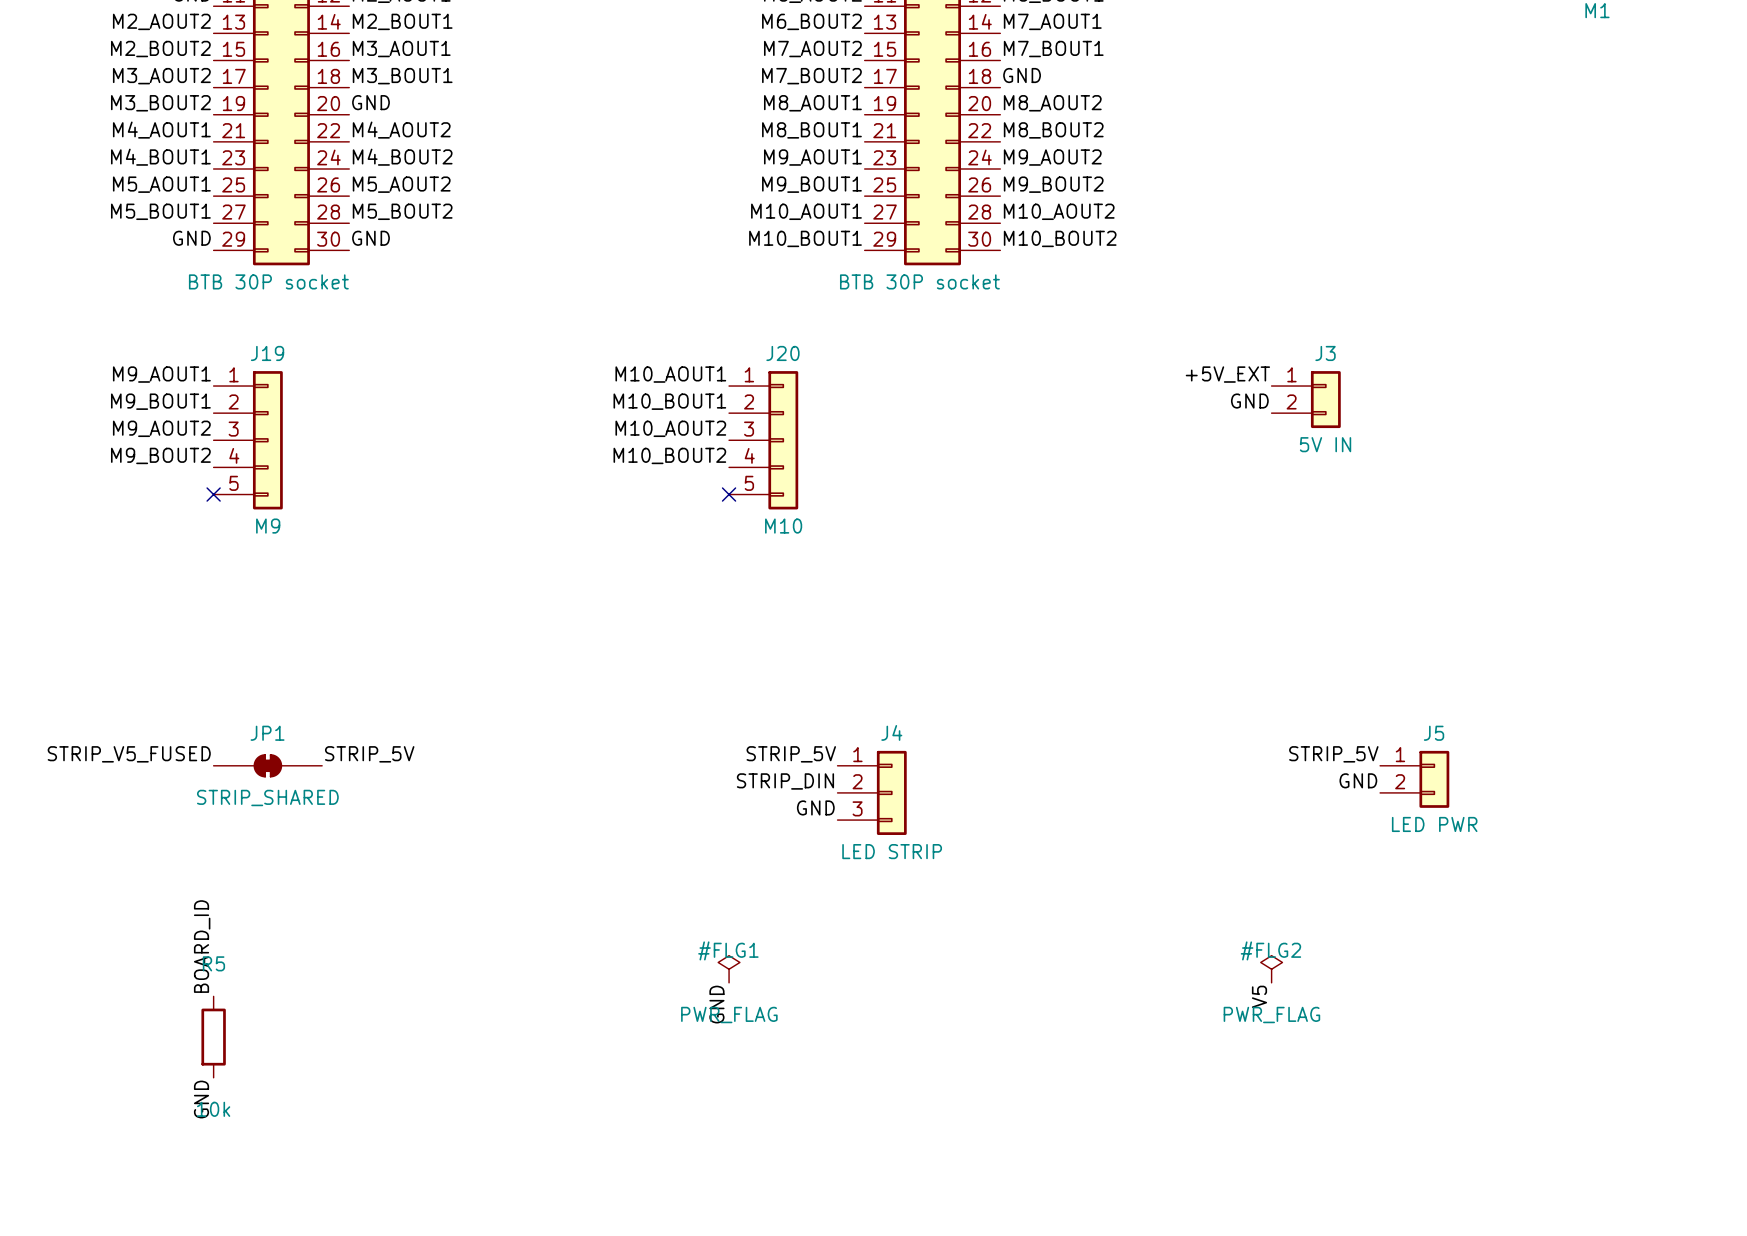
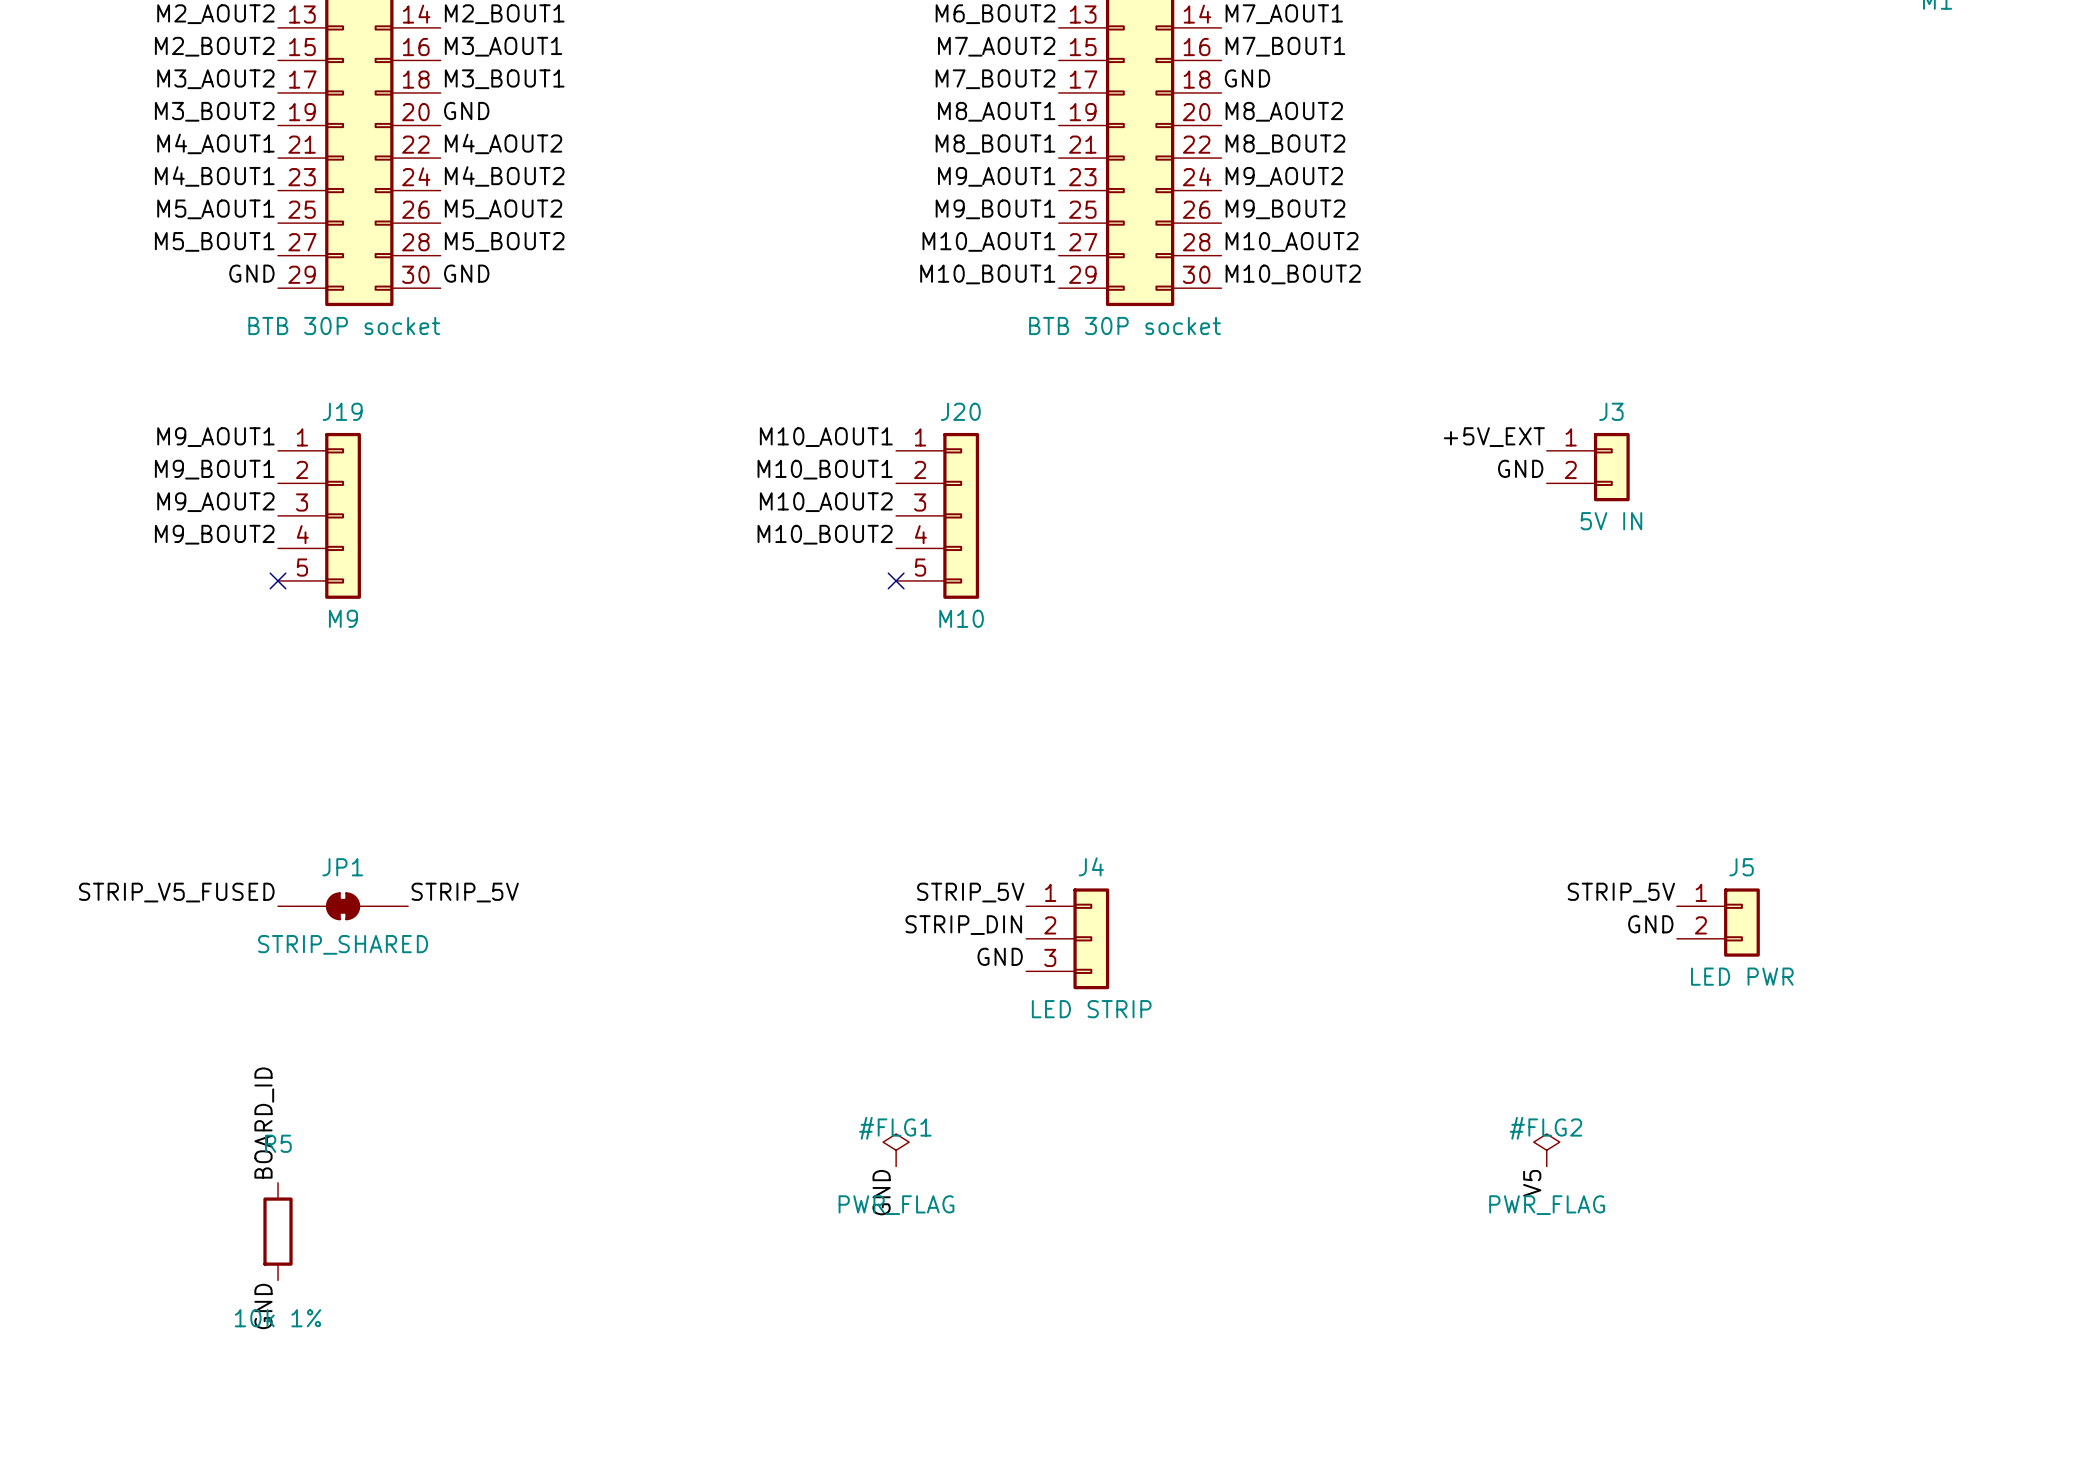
R5 value: 10k (213, 1109) -> 10k 1% (278, 1318)

